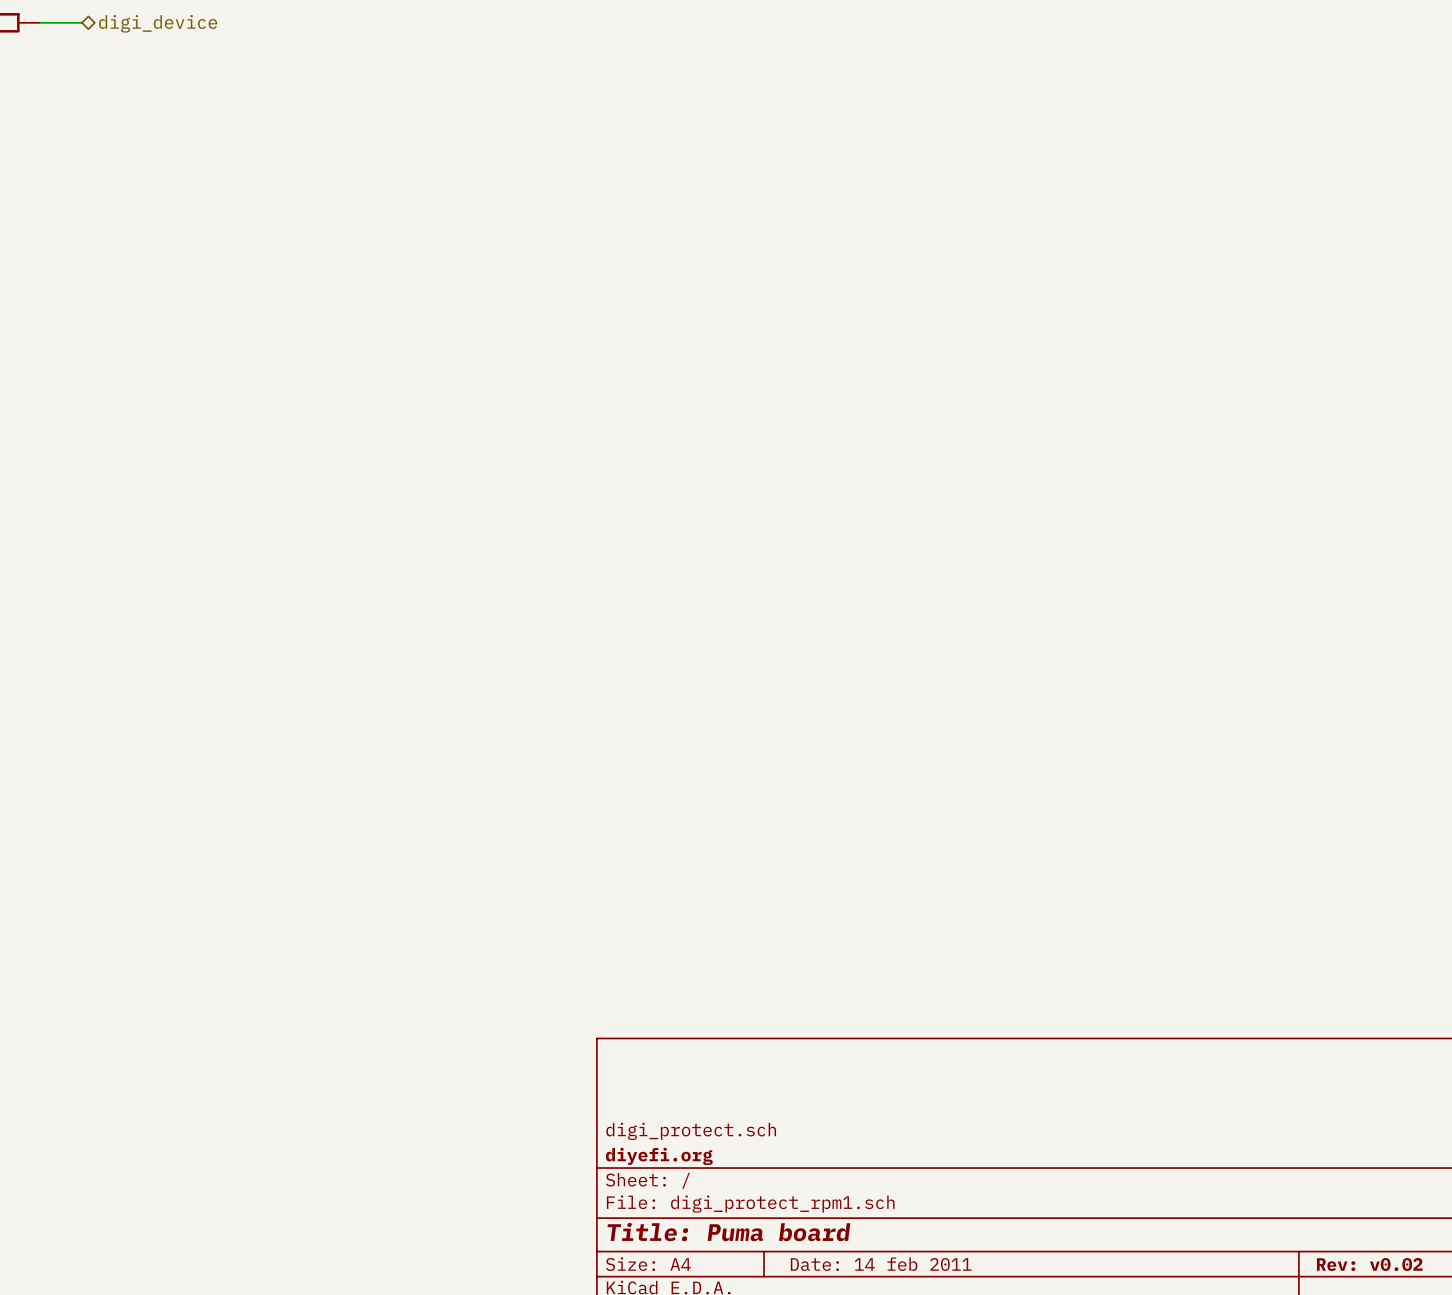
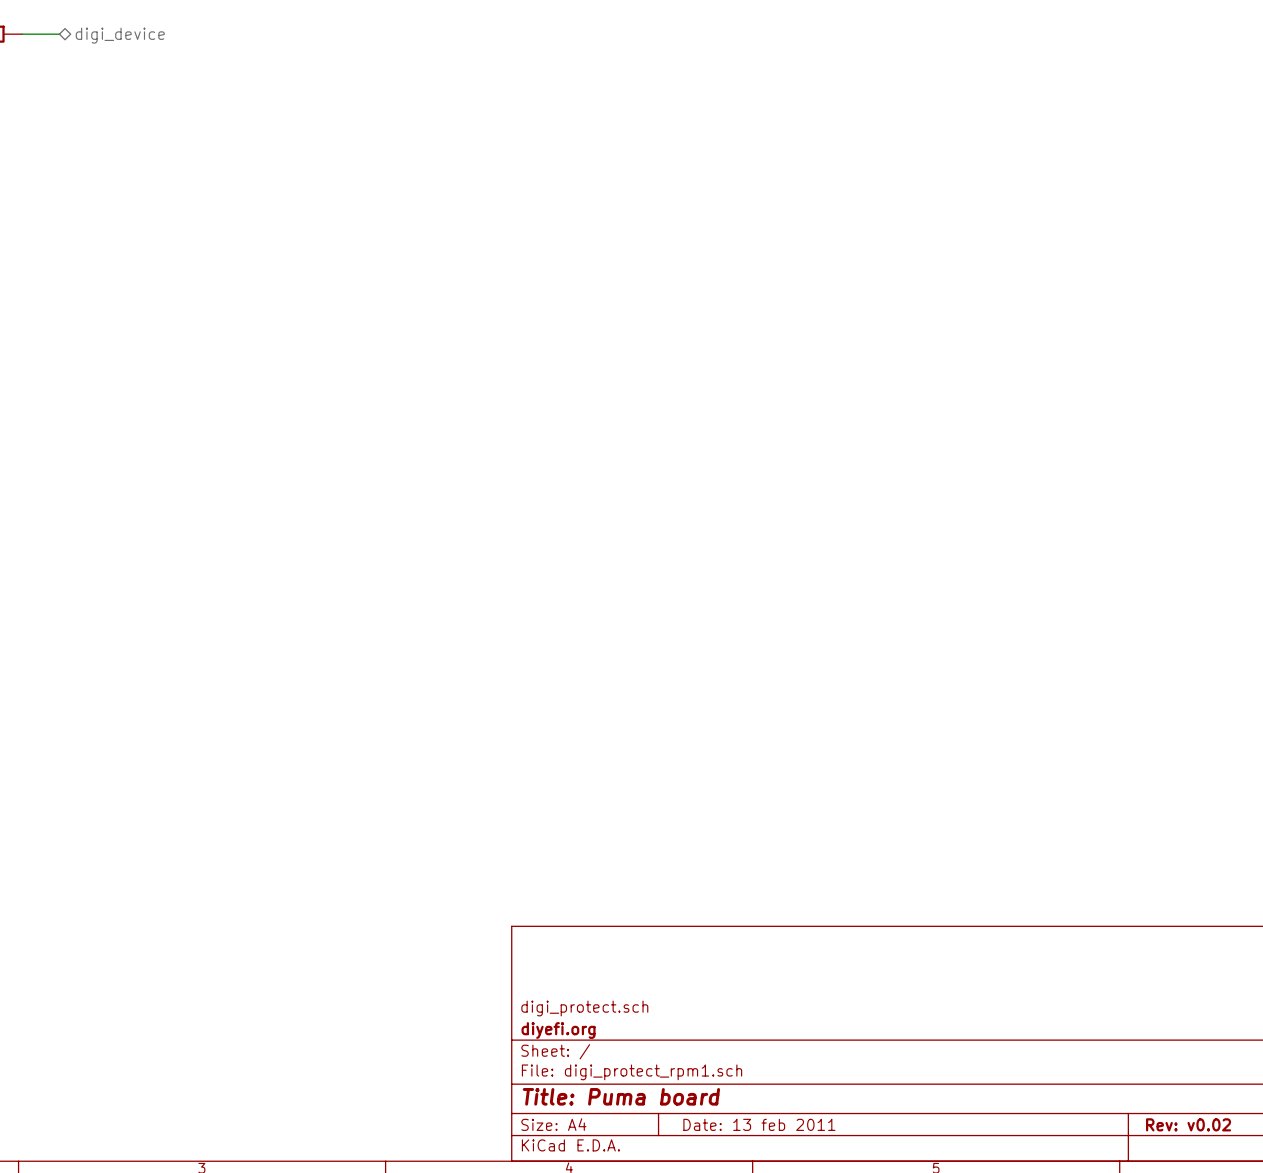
title block: Date: 14 feb 2011 (881, 1264) -> Date: 13 feb 2011 (759, 1124)

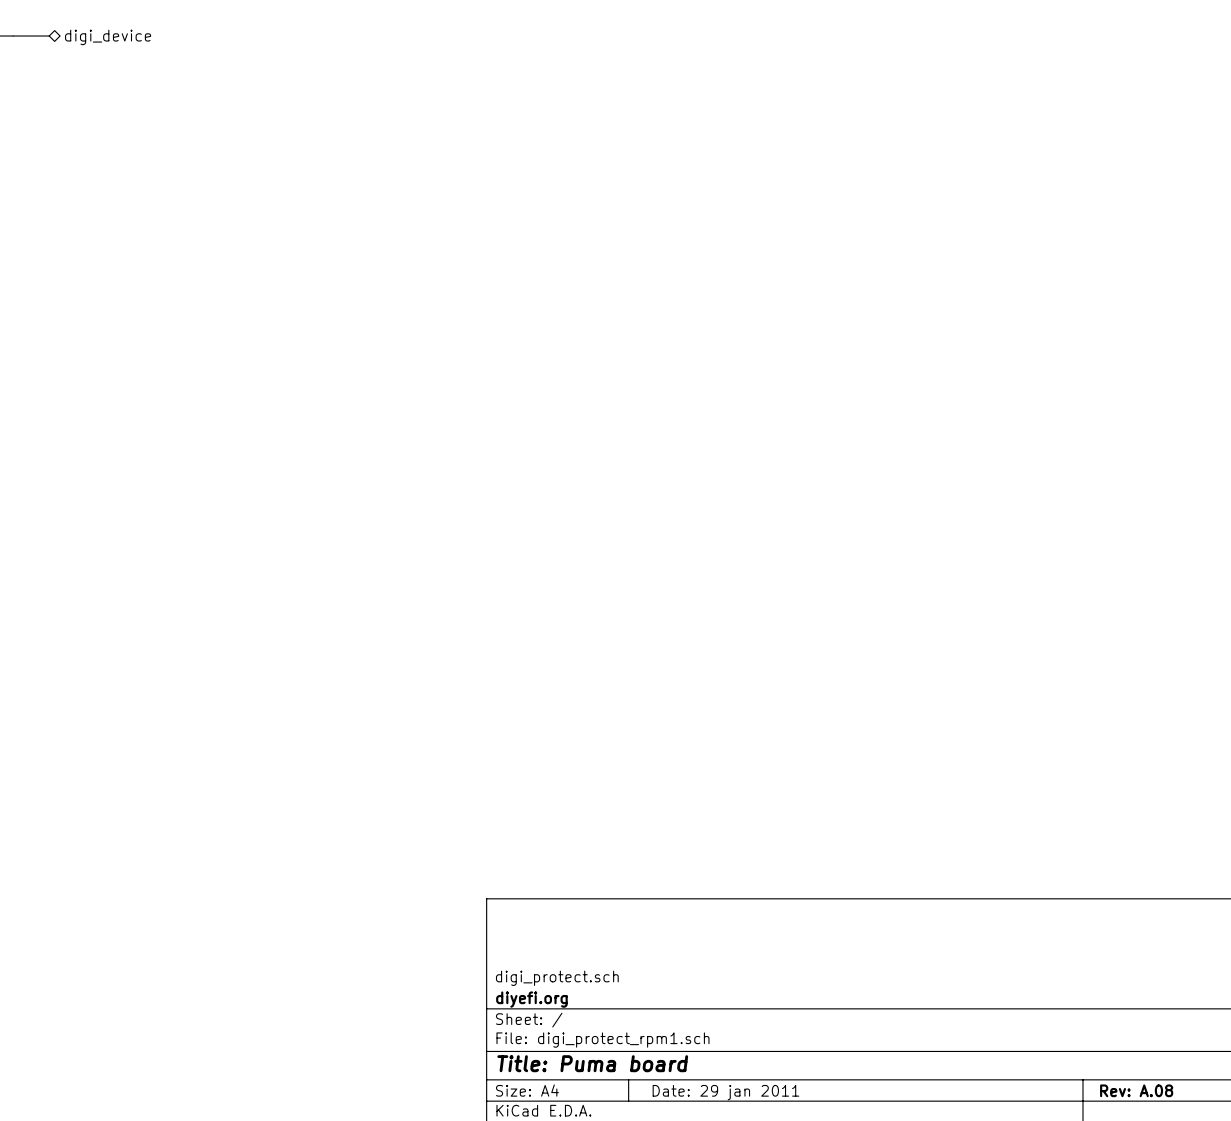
title block: Date: 13 feb 2011 (759, 1124) -> Date: 29 jan 2011 (725, 1092)
title block: Rev: v0.02 (1188, 1124) -> Rev: A.08 (1136, 1090)

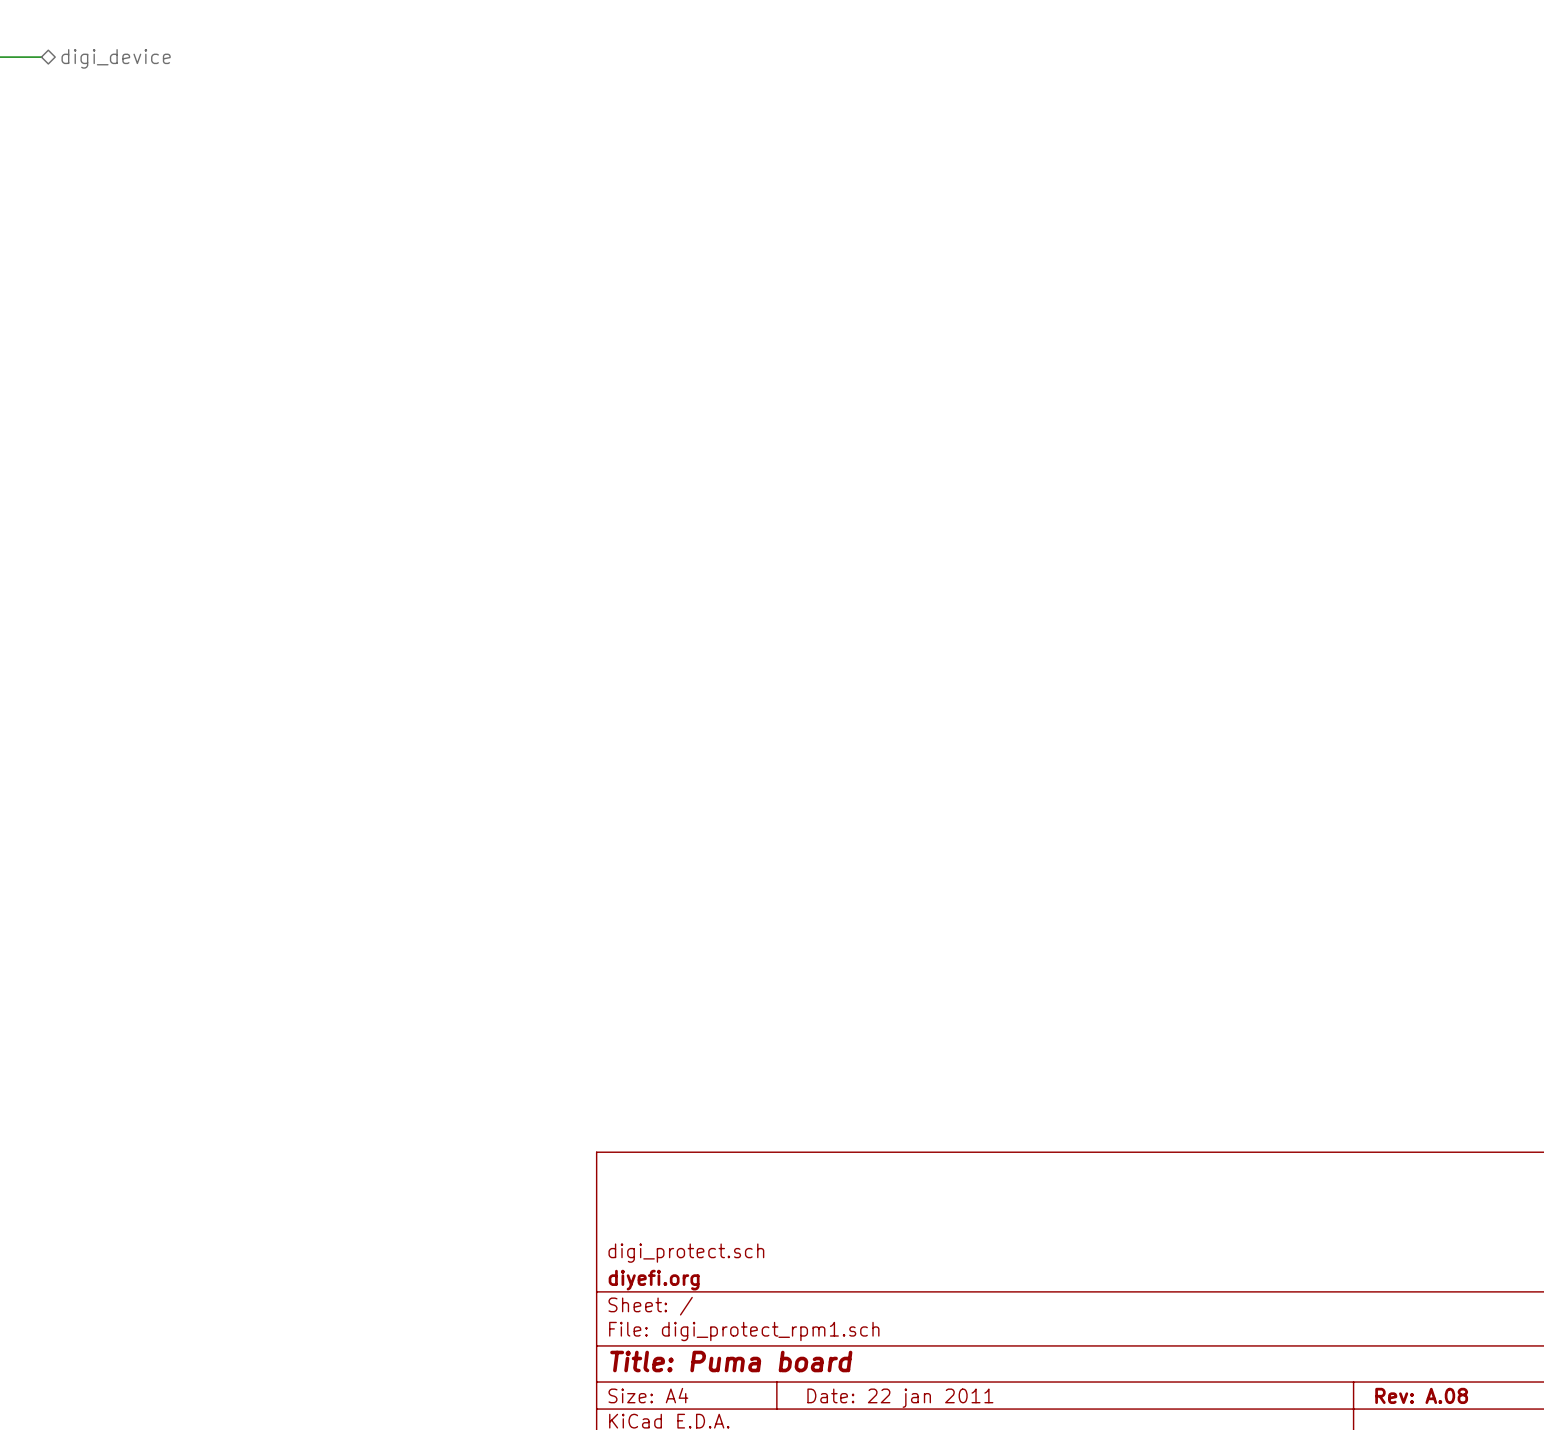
title block: Date: 29 jan 2011 (725, 1092) -> Date: 22 jan 2011 (900, 1398)

